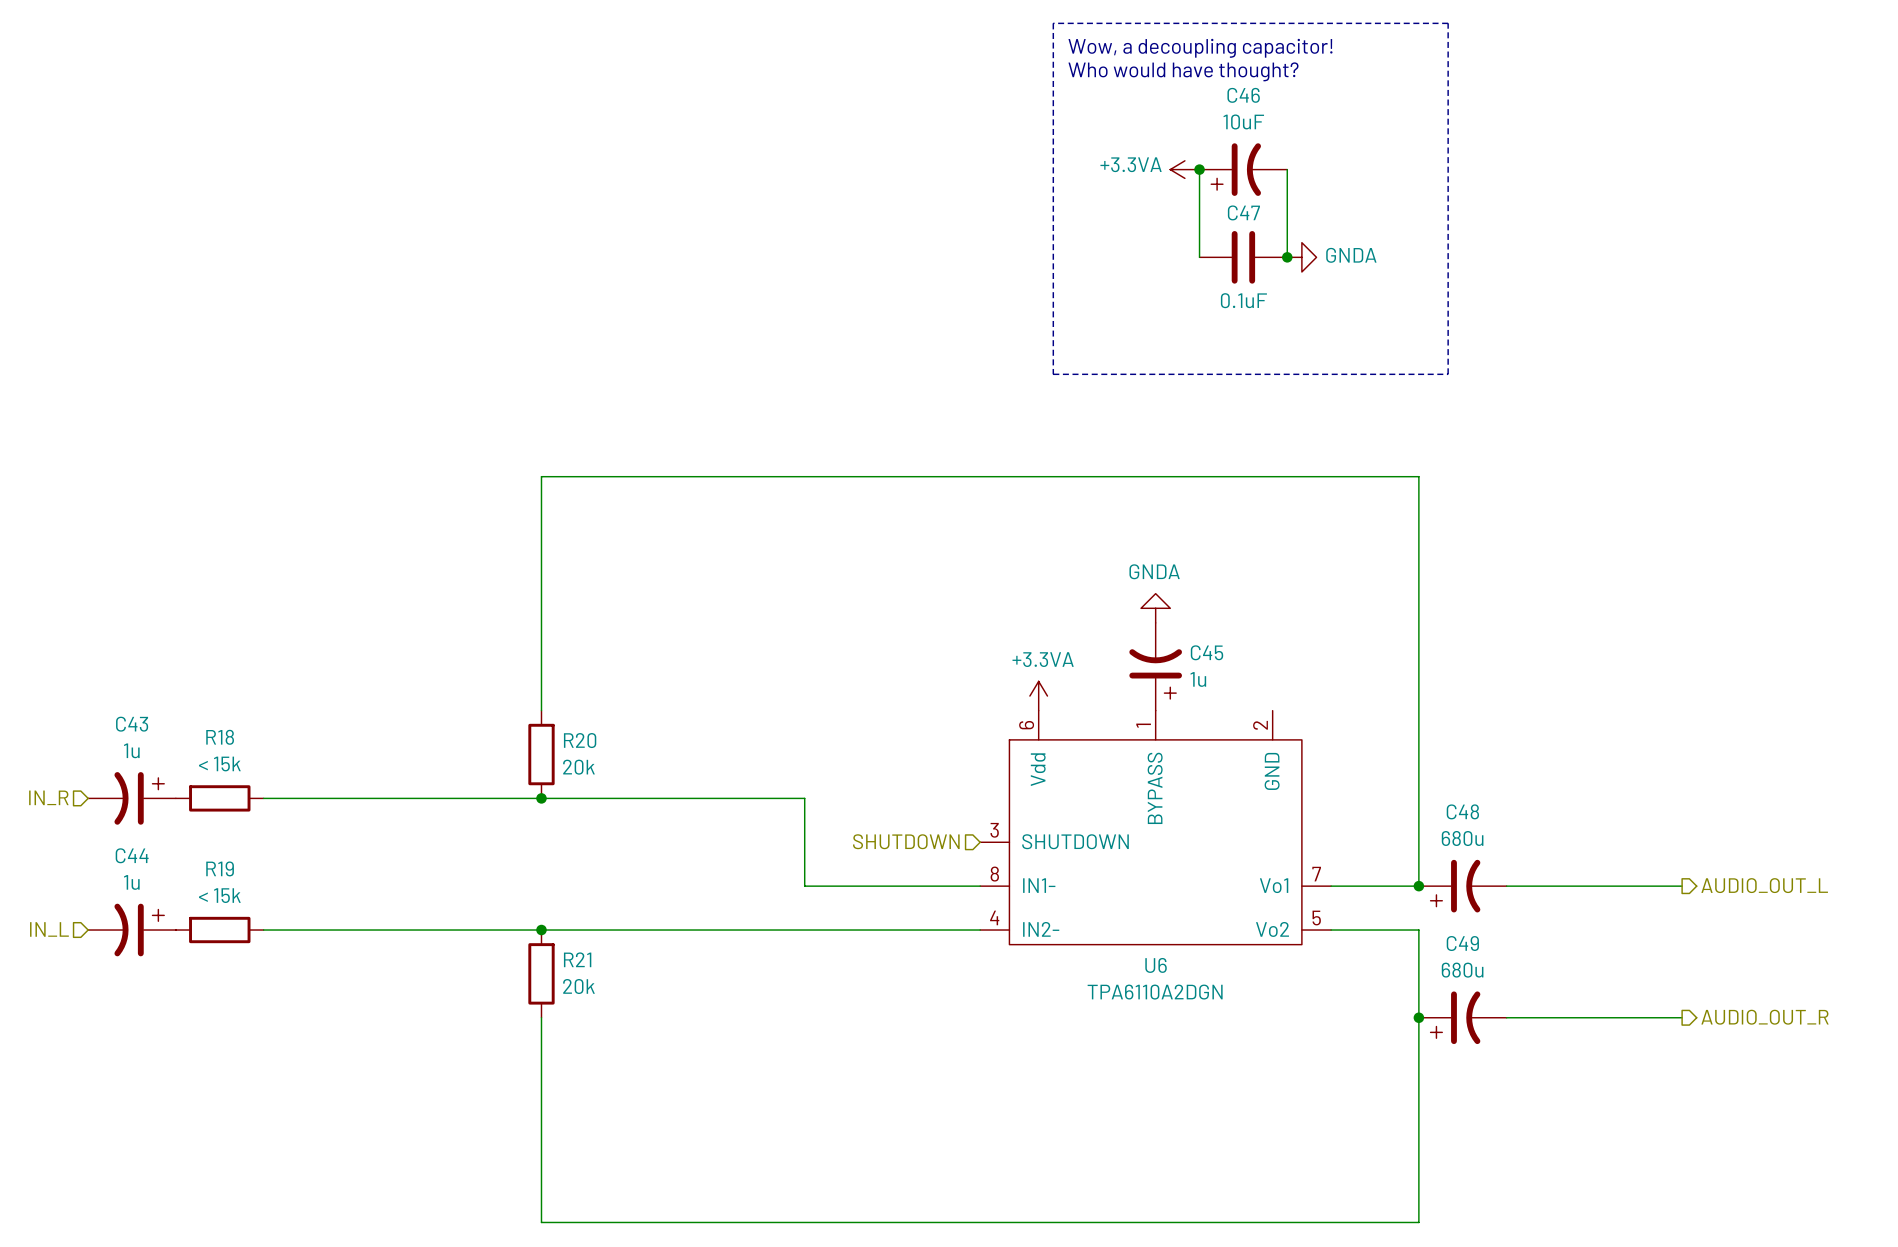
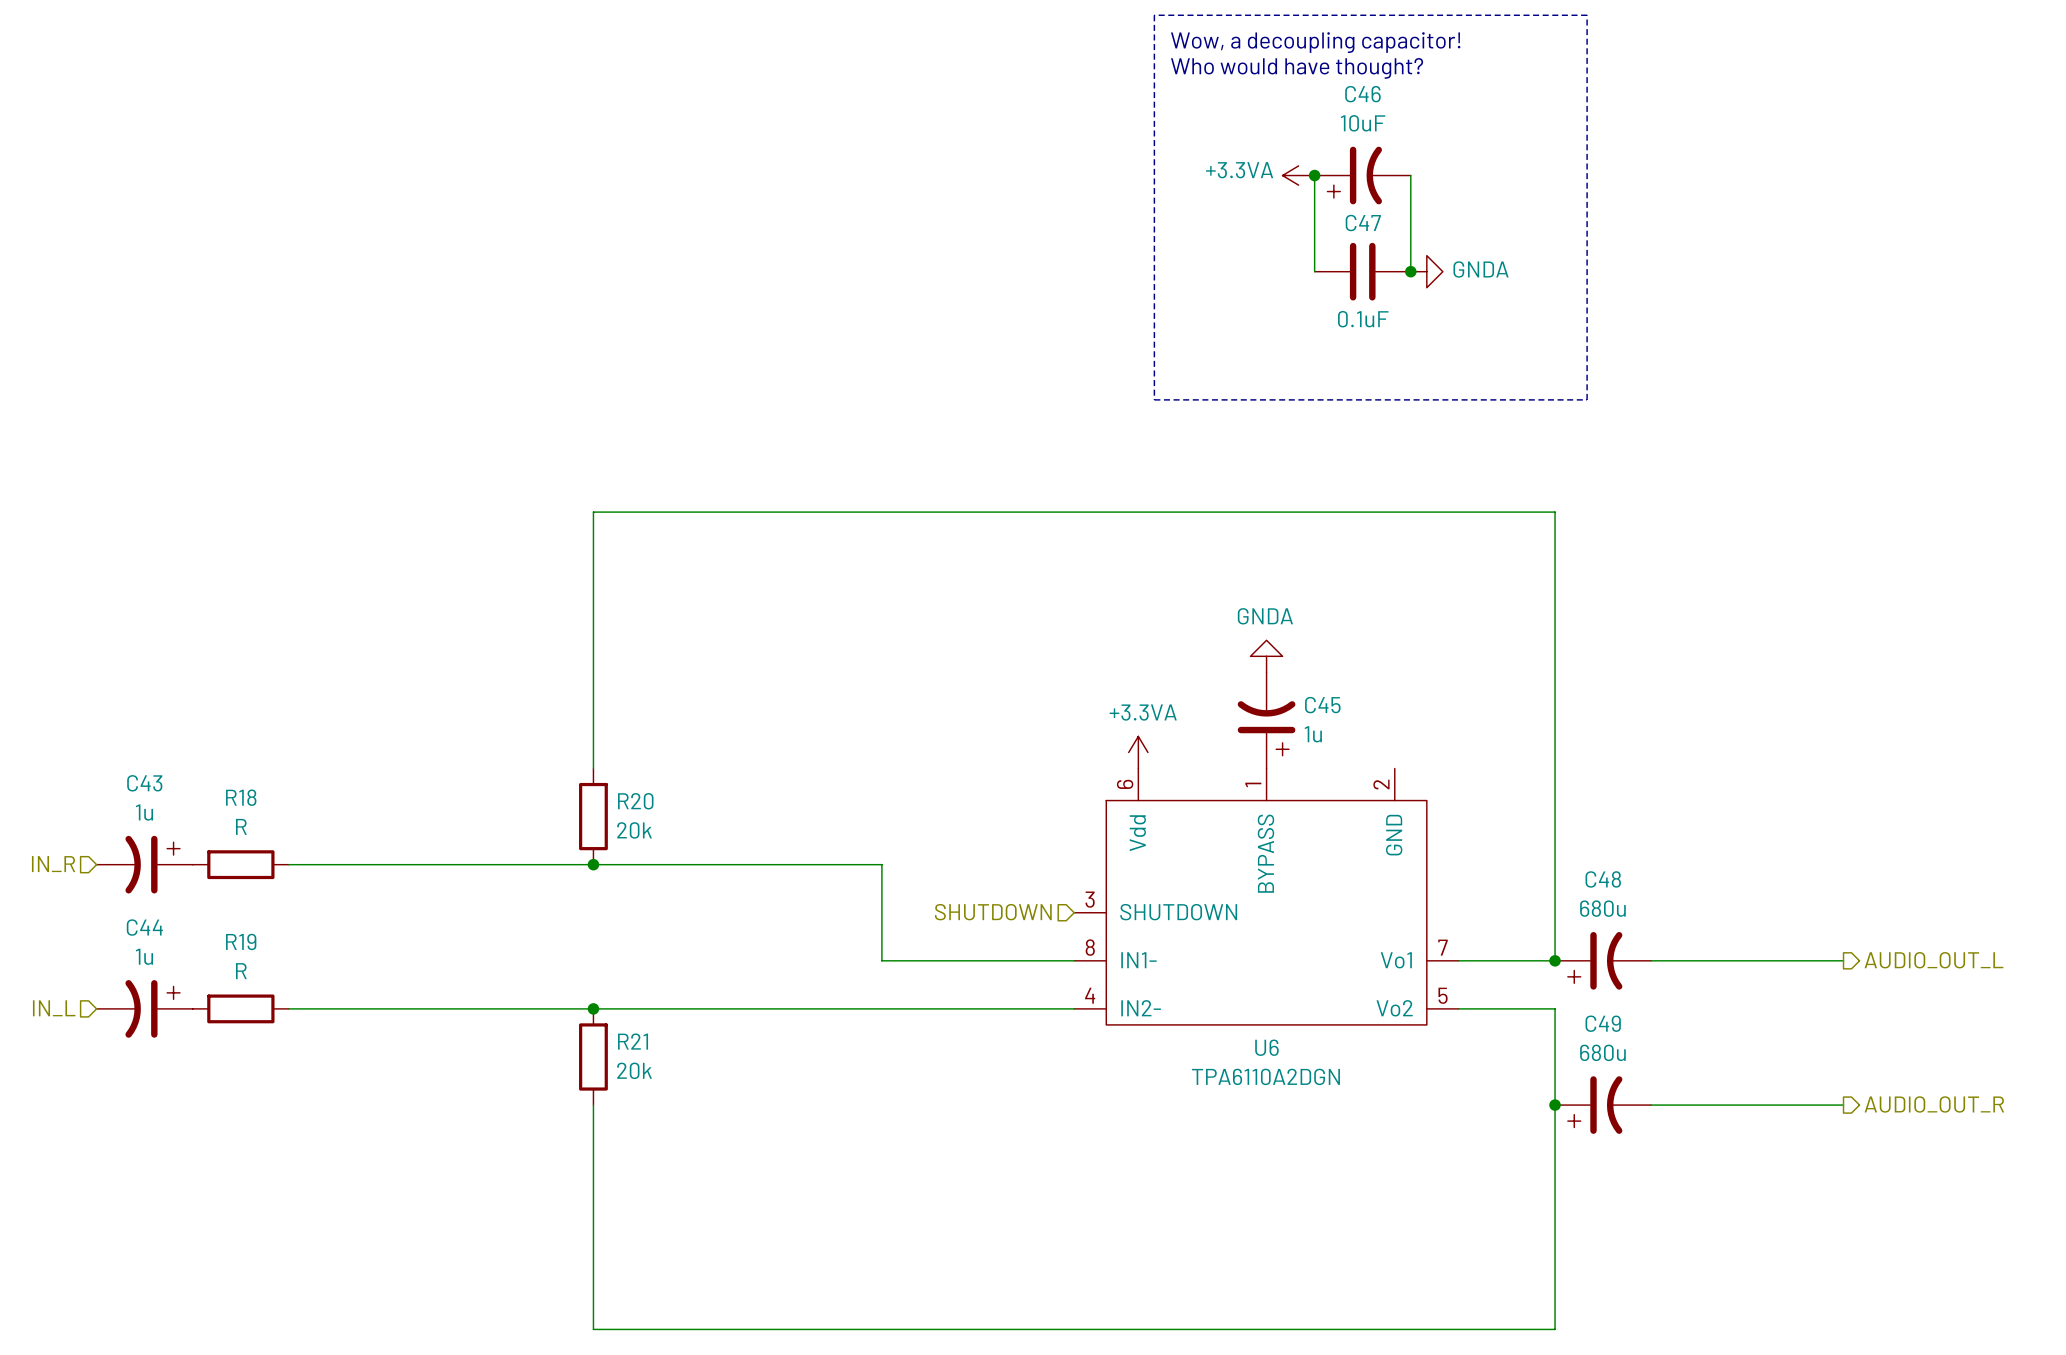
R18 value: < 15k (219, 764) -> R (241, 826)
R19 value: < 15k (219, 895) -> R (241, 971)

